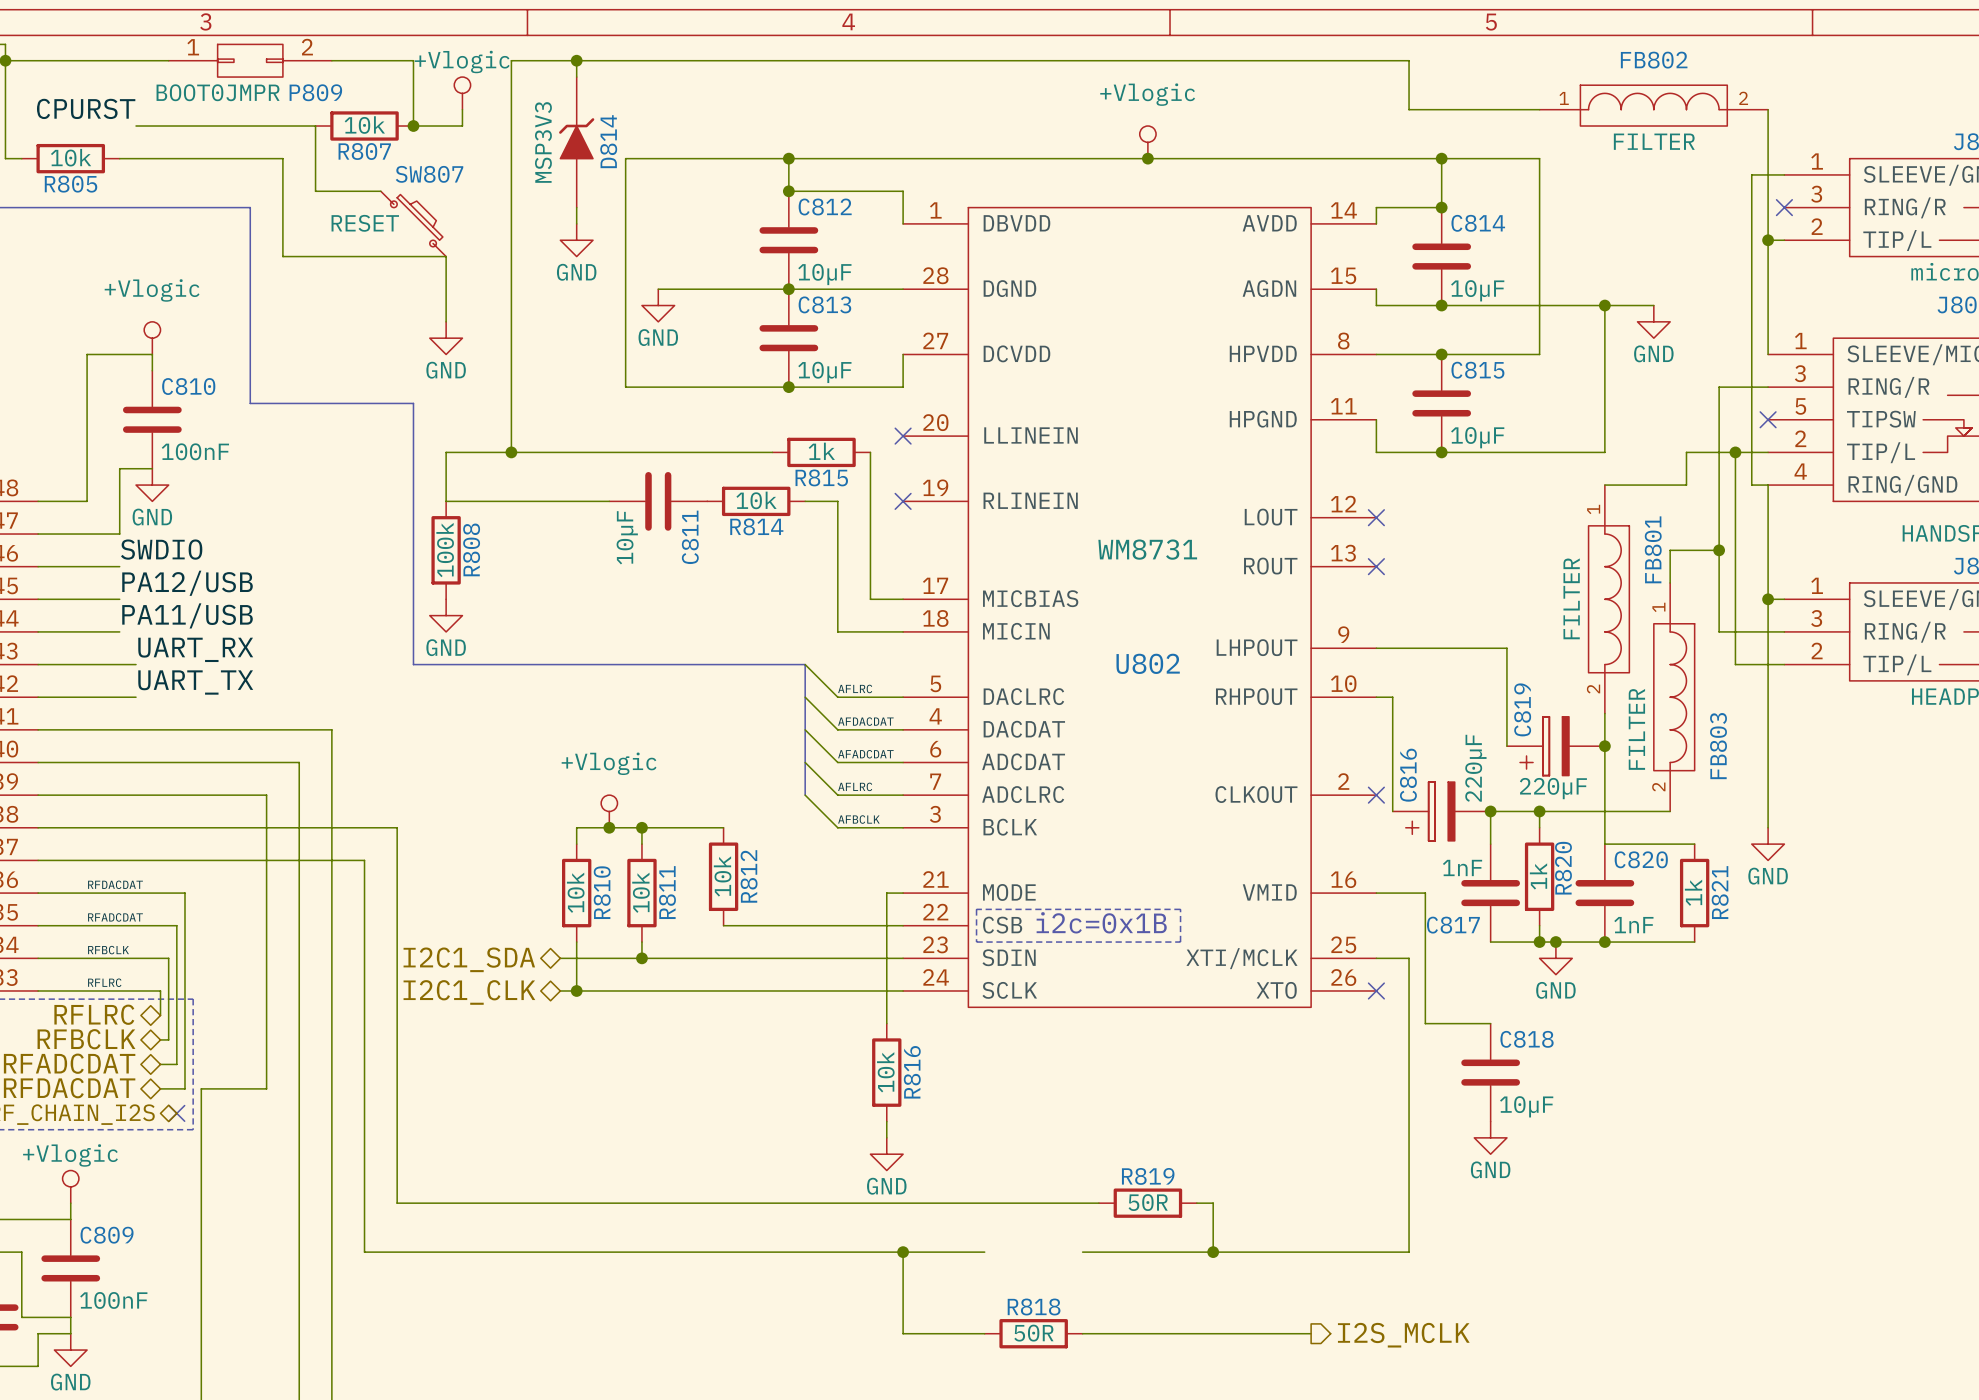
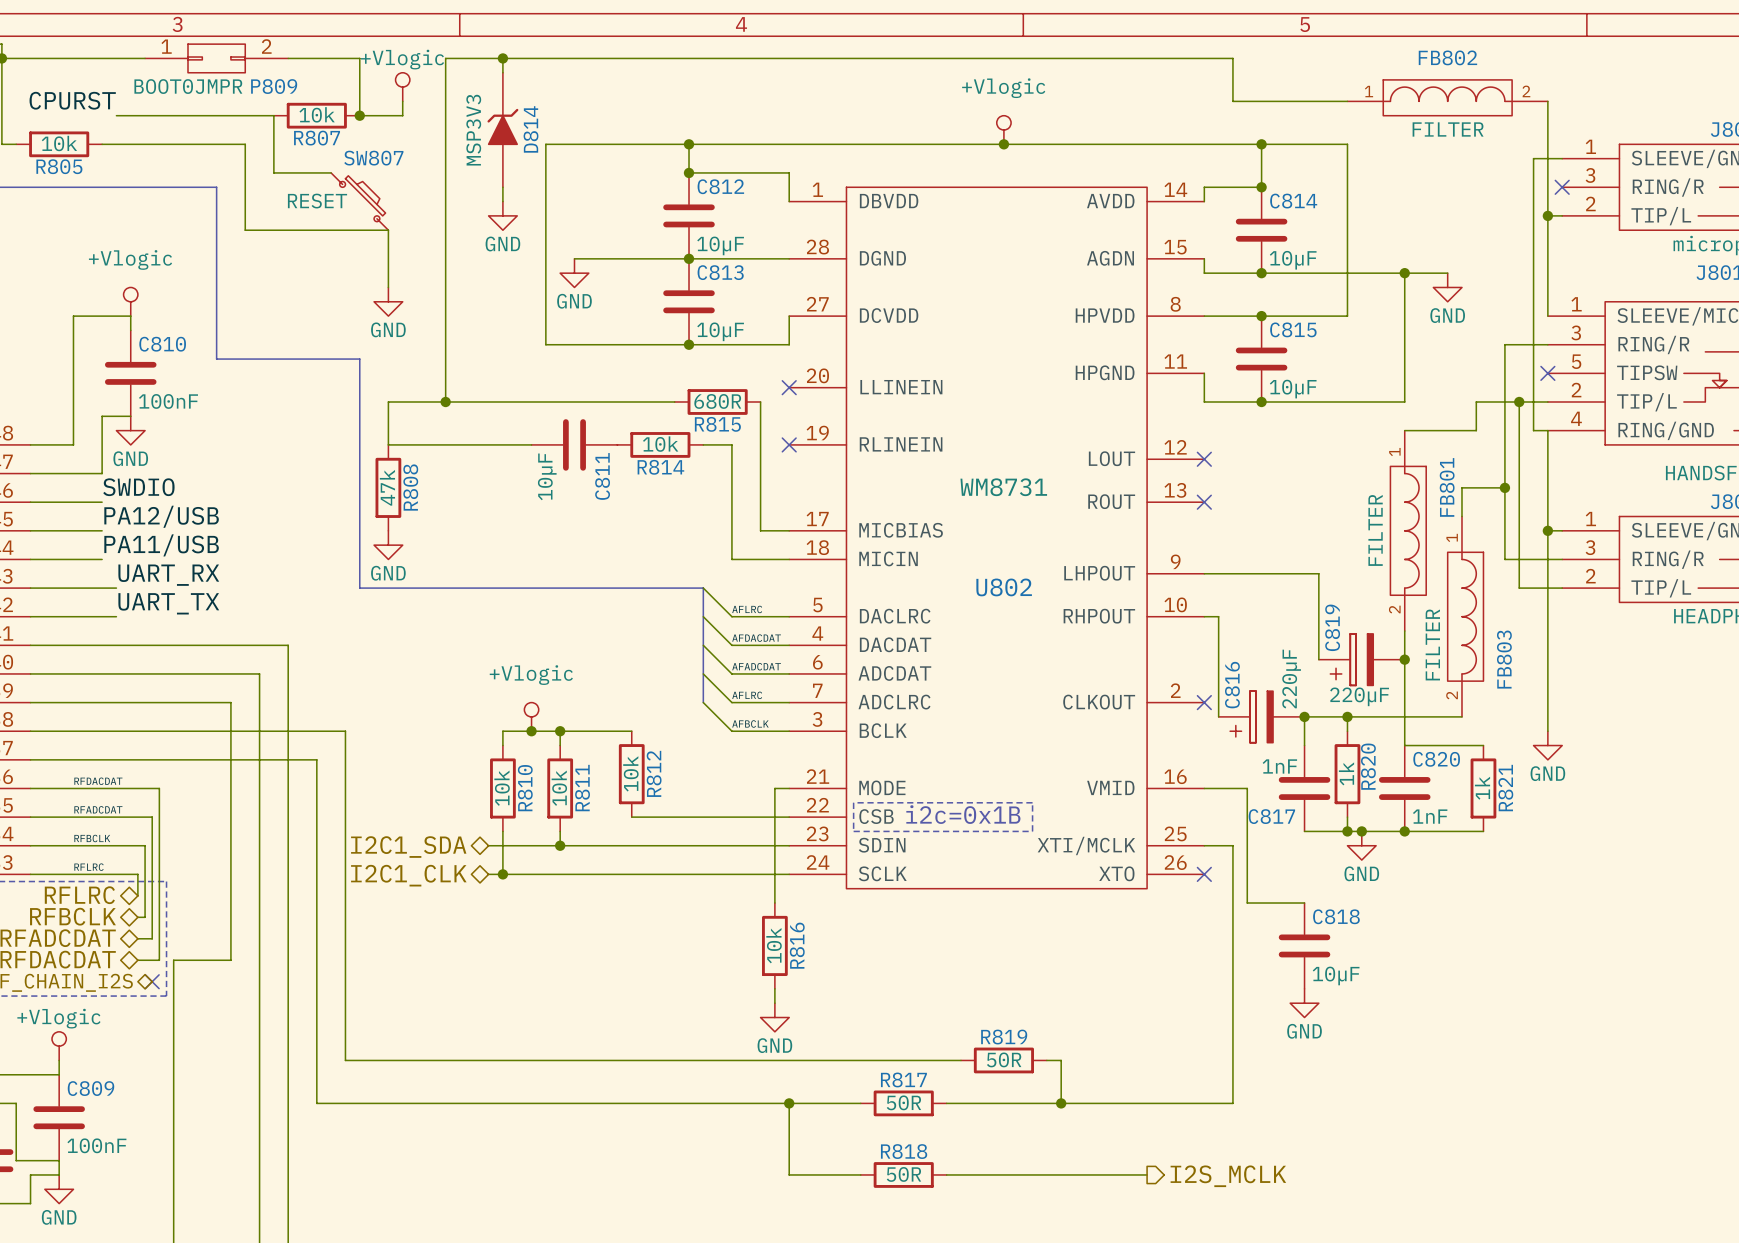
R815 value: 1k (821, 451) -> 680R (717, 401)
R808 value: 100k (445, 550) -> 47k (387, 487)
R817: none -> 50R (903, 1103)

